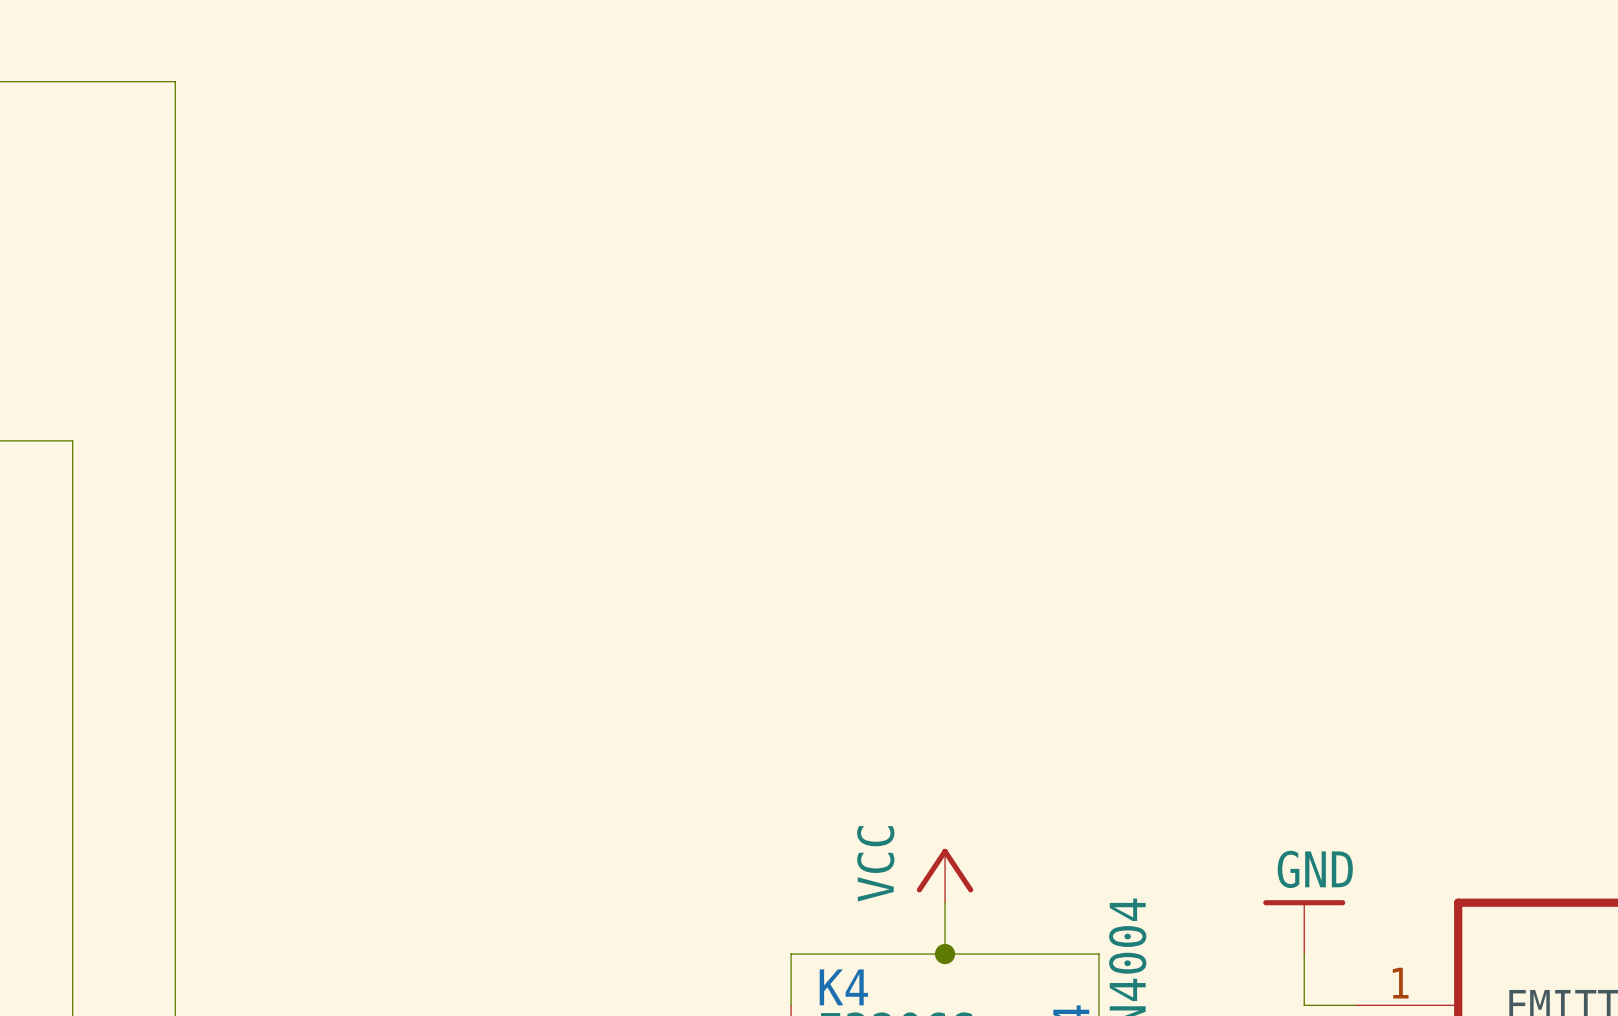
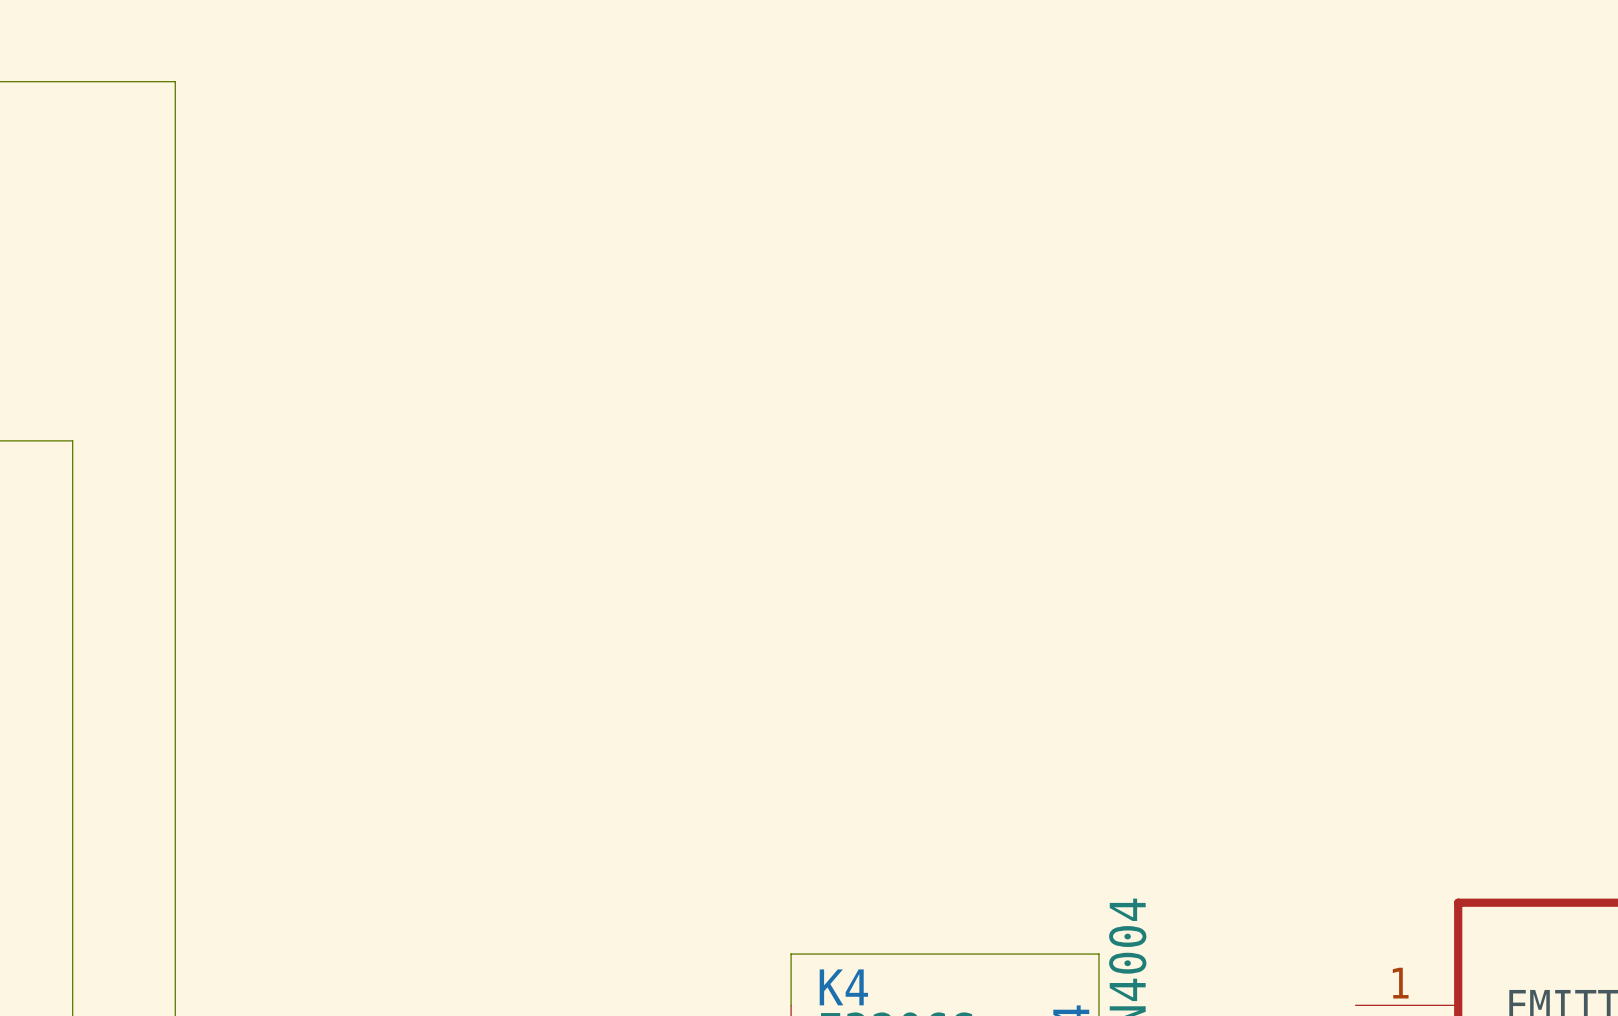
power symbol: VCC (945, 875) -> none
wire: (945, 902) (945, 954) -> none
power symbol: GND (1304, 927) -> none
junction: (945, 954) -> none
wire: (1304, 954) (1304, 1005) (1355, 1005) -> none

